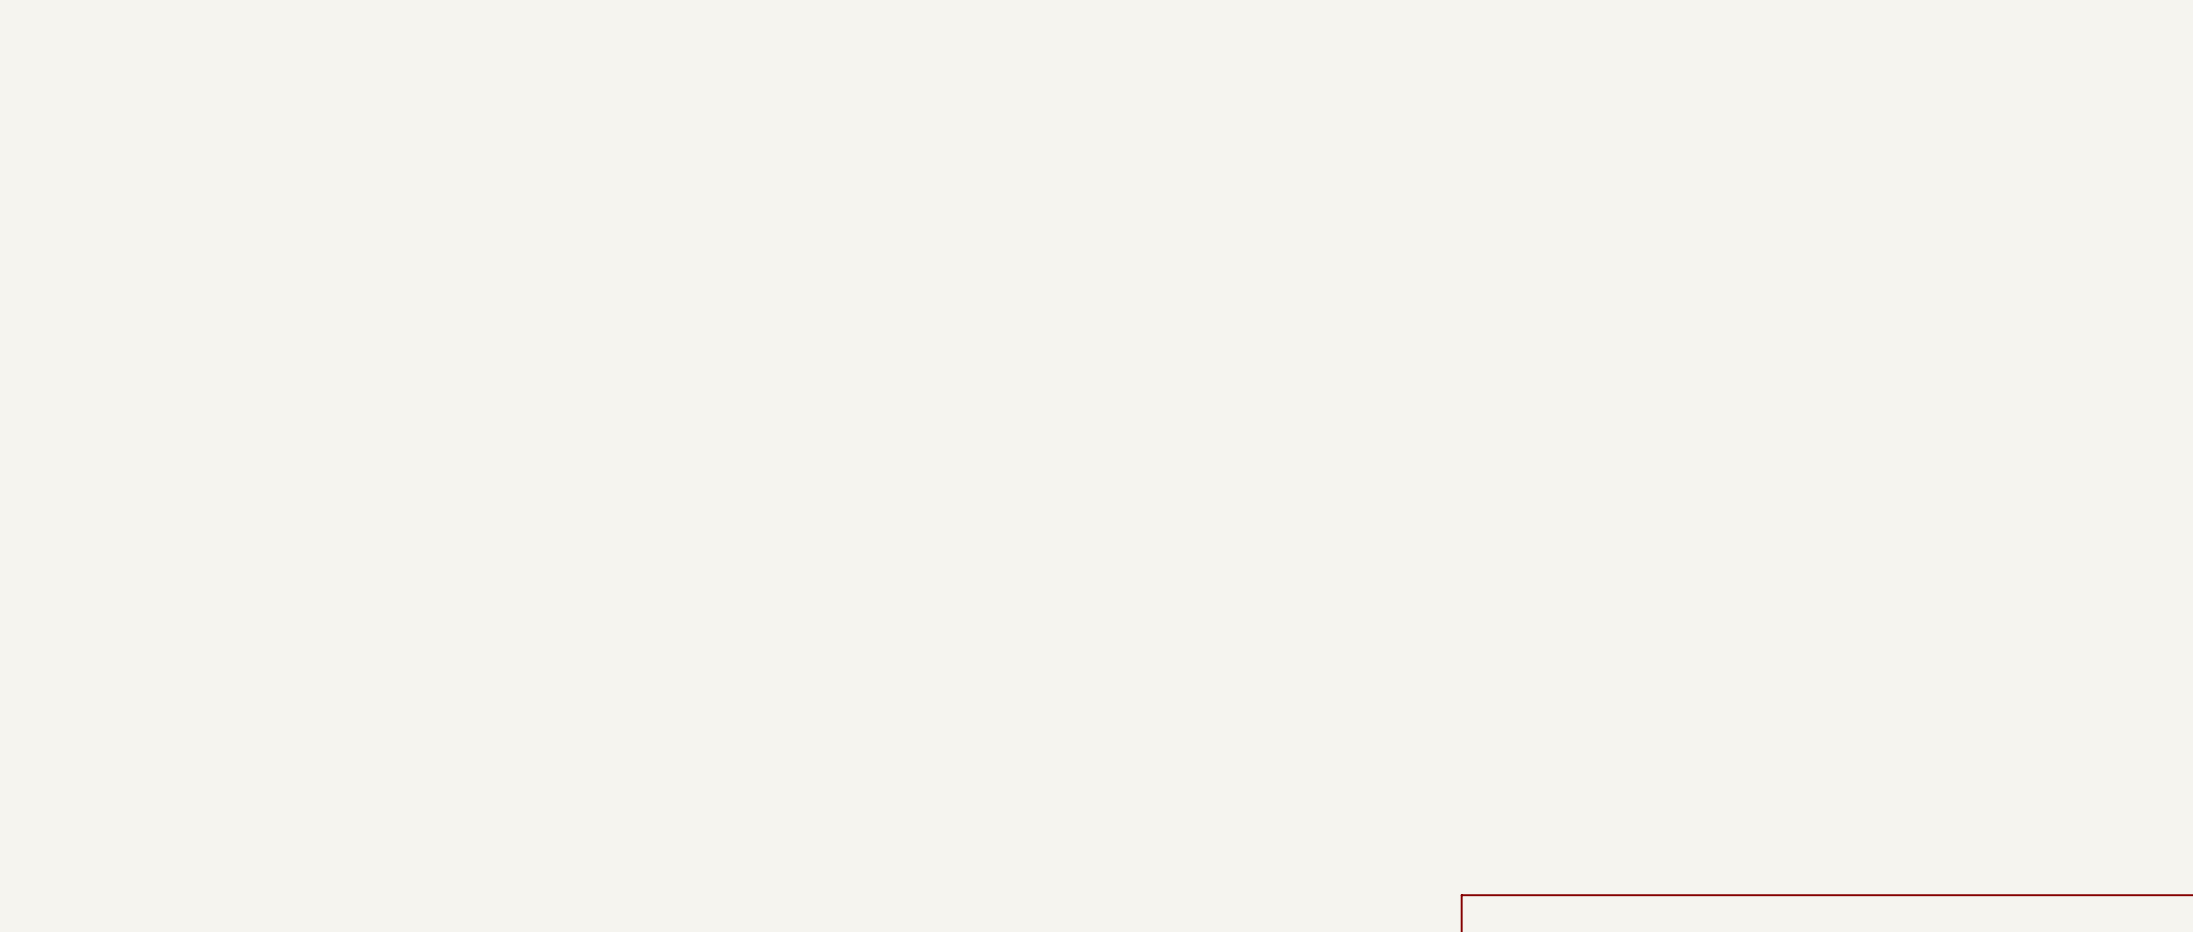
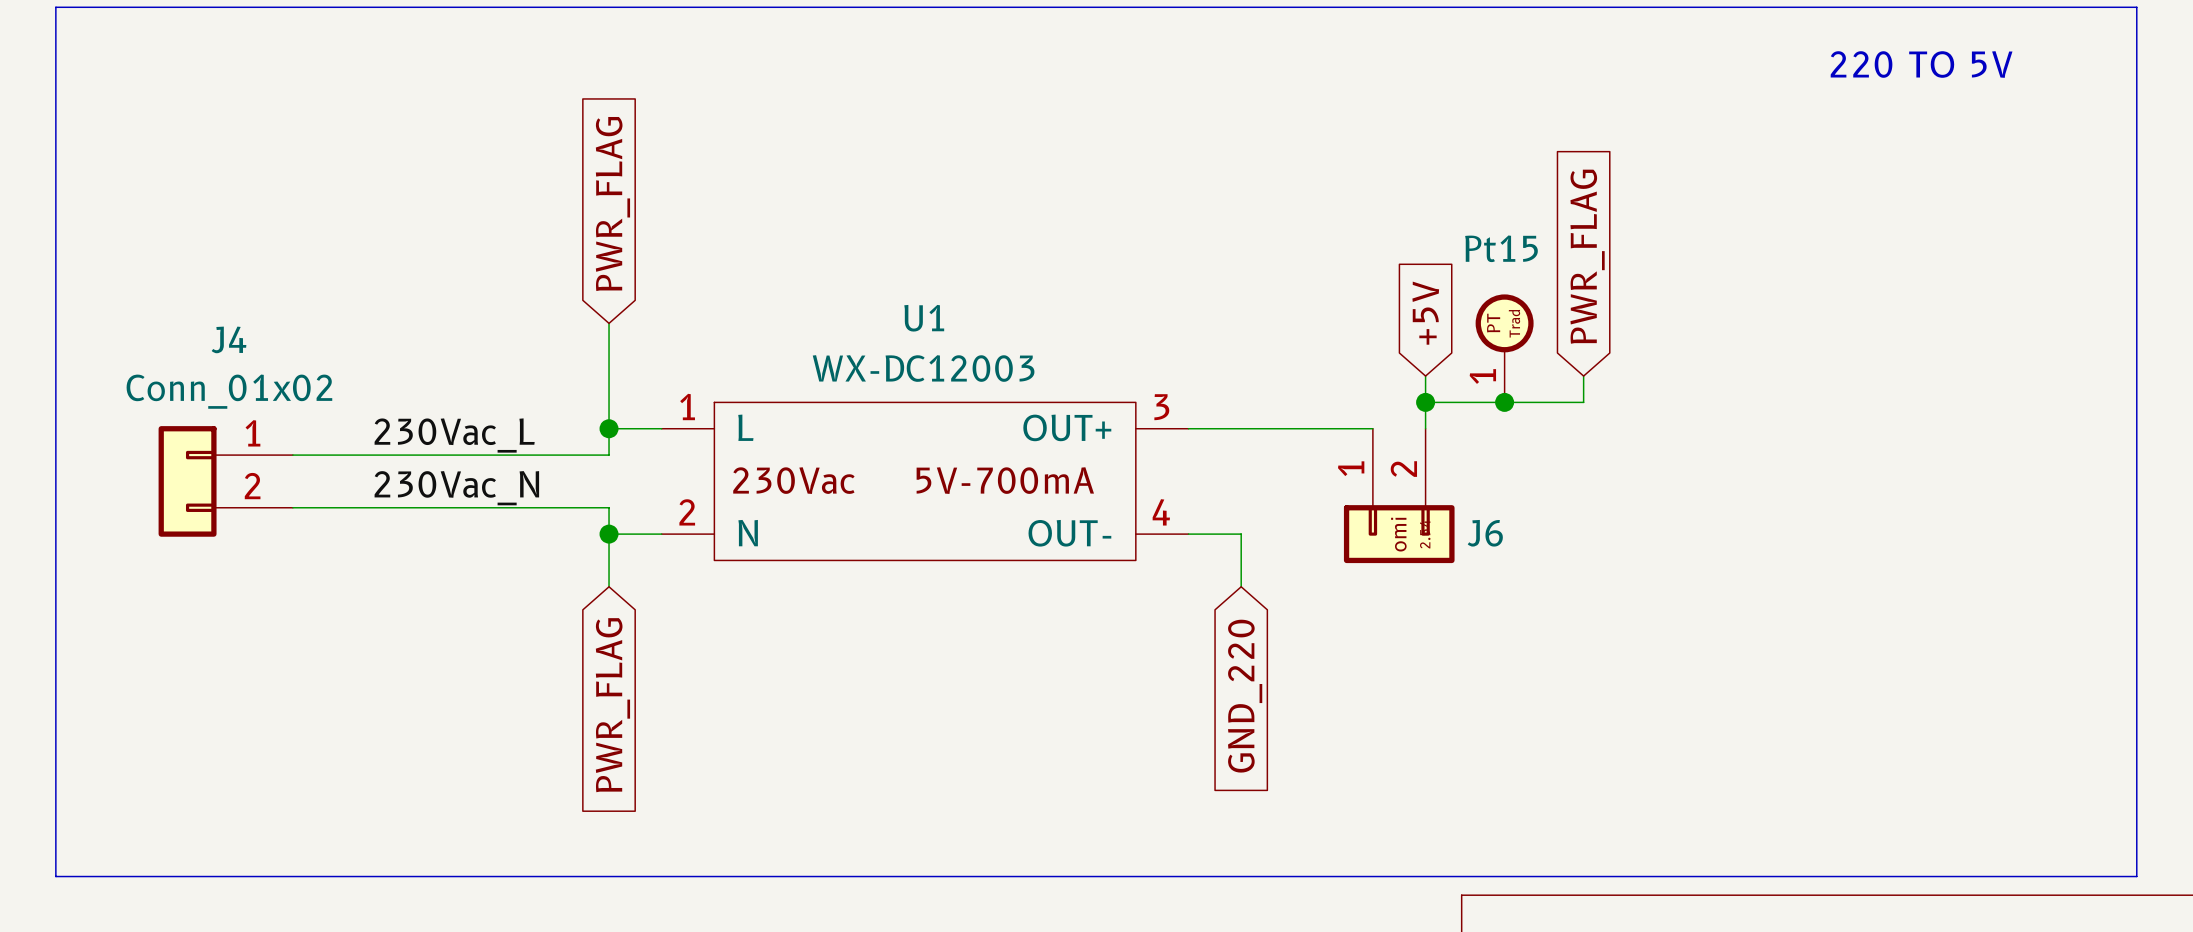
line: none -> (55, 7) (2136, 7) (2136, 876) (55, 876) (55, 7)
text: none -> 220 TO 5V (1921, 64)
global label: none -> PWR_FLAG (612, 204)
global label: none -> PWR_FLAG (1587, 256)
global label: none -> +5V (1425, 313)
wire: none -> (609, 323) (609, 455) (292, 455)
Pt15: none -> (1504, 348)
wire: none -> (1425, 376) (1425, 428)
wire: none -> (1583, 376) (1583, 402) (1425, 402)
junction: none -> (1425, 402)
junction: none -> (1504, 402)
wire: none -> (609, 428) (661, 428)
junction: none -> (609, 428)
wire: none -> (1188, 428) (1372, 428)
label: none -> 230Vac_L (454, 435)
J4: none -> Conn_01x02 (225, 481)
U1: none -> WX-DC12003 (925, 481)
label: none -> 230Vac_N (456, 488)
J6: none -> (1399, 495)
wire: none -> (292, 507) (609, 507) (609, 586)
wire: none -> (609, 534) (661, 534)
junction: none -> (609, 534)
wire: none -> (1188, 534) (1241, 534) (1241, 586)
global label: none -> GND_220 (1245, 696)
global label: none -> PWR_FLAG (612, 705)

